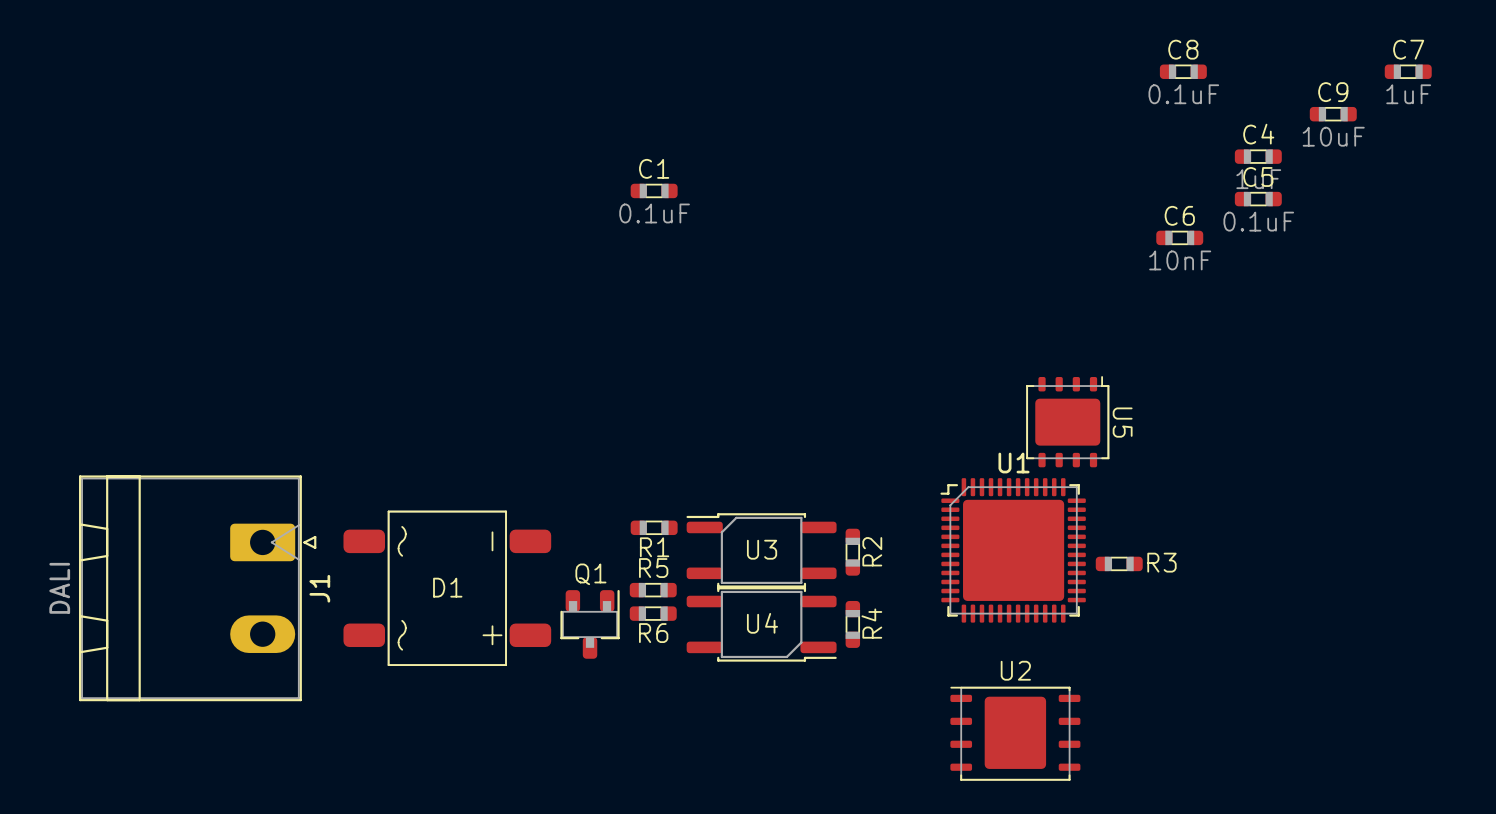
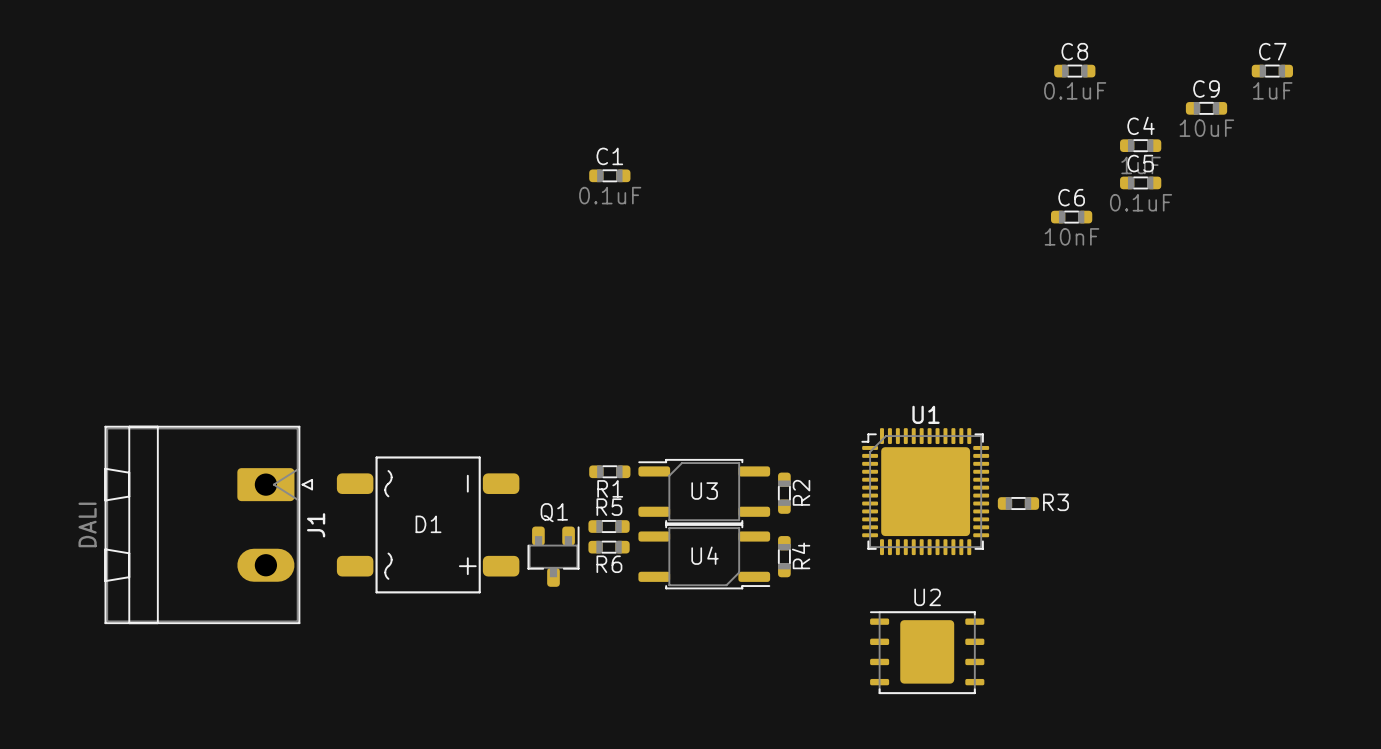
U5: (1067, 421) -> none

